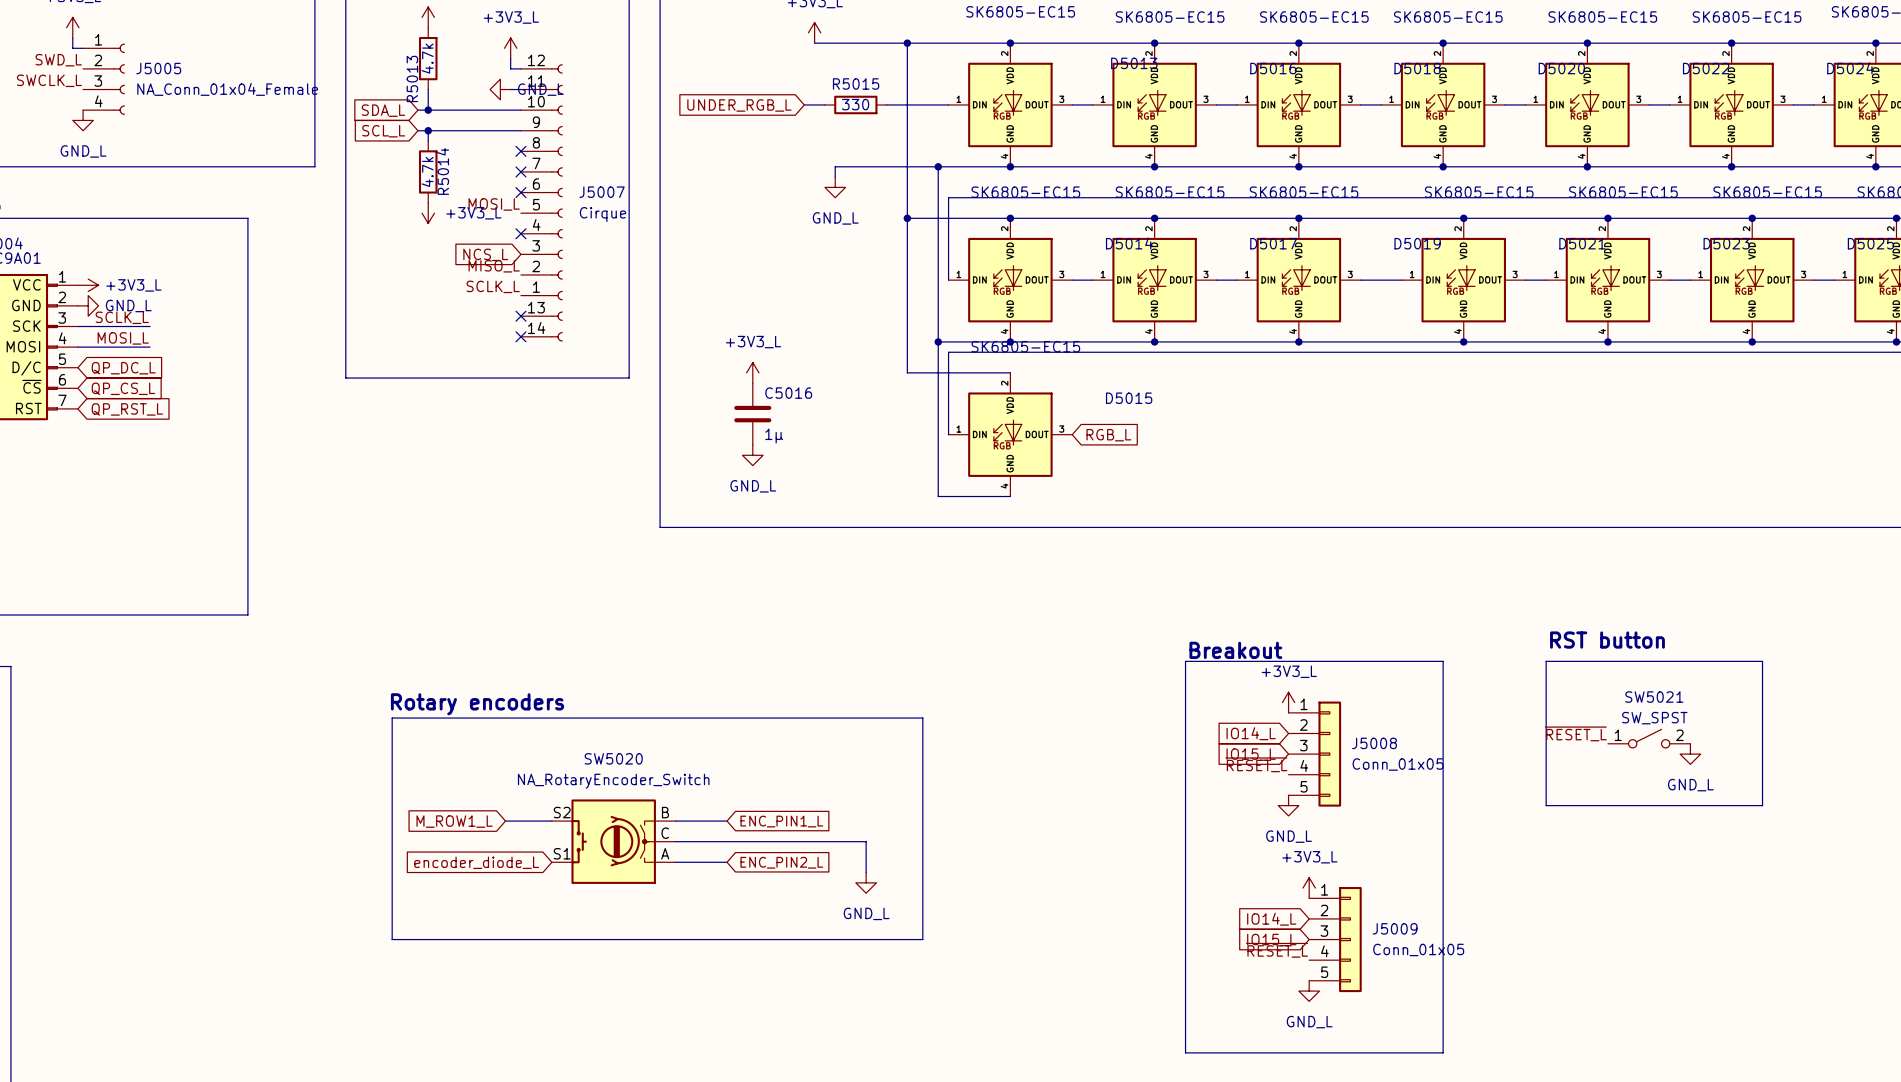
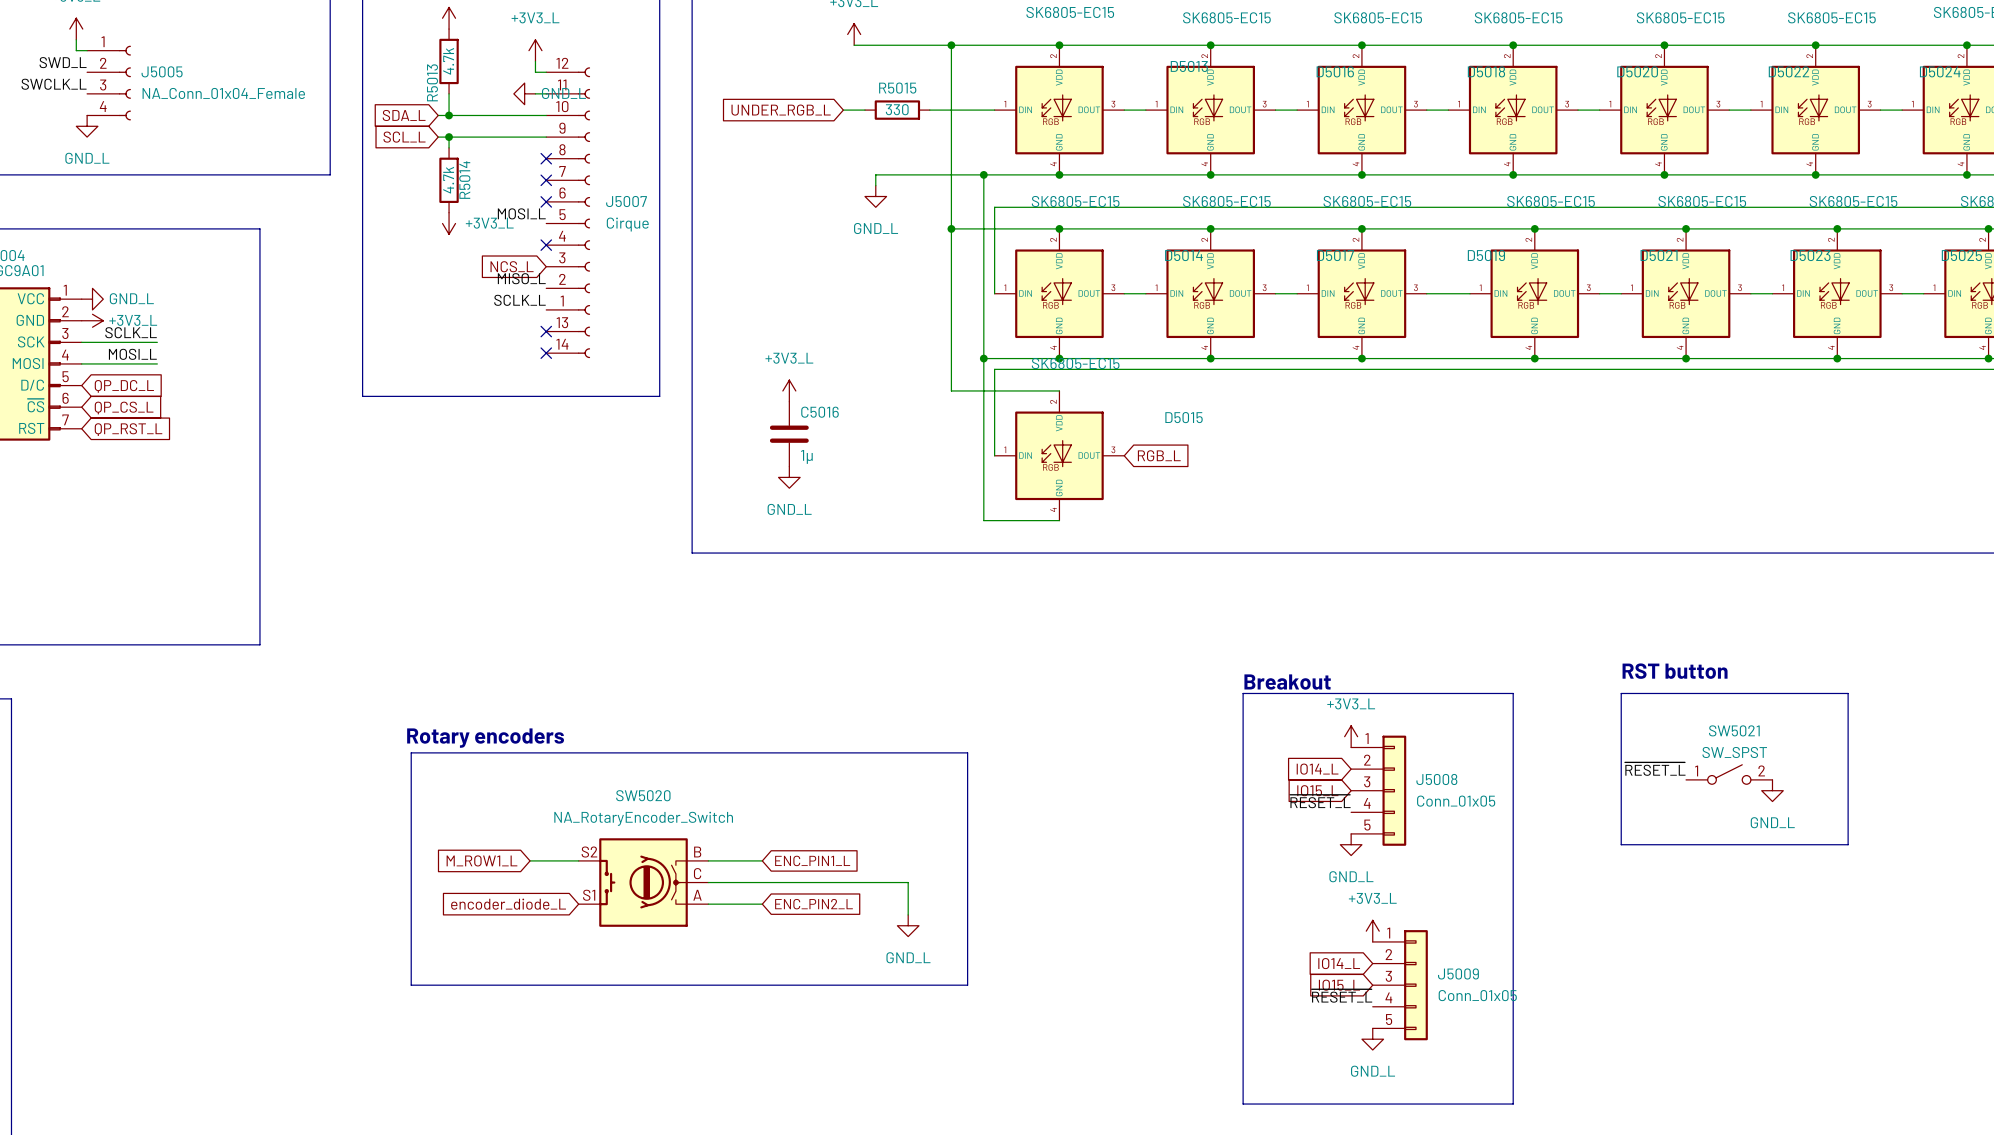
power symbol: +3V3_L (88, 285) -> GND_L (92, 299)
power symbol: GND_L (88, 305) -> +3V3_L (92, 320)

